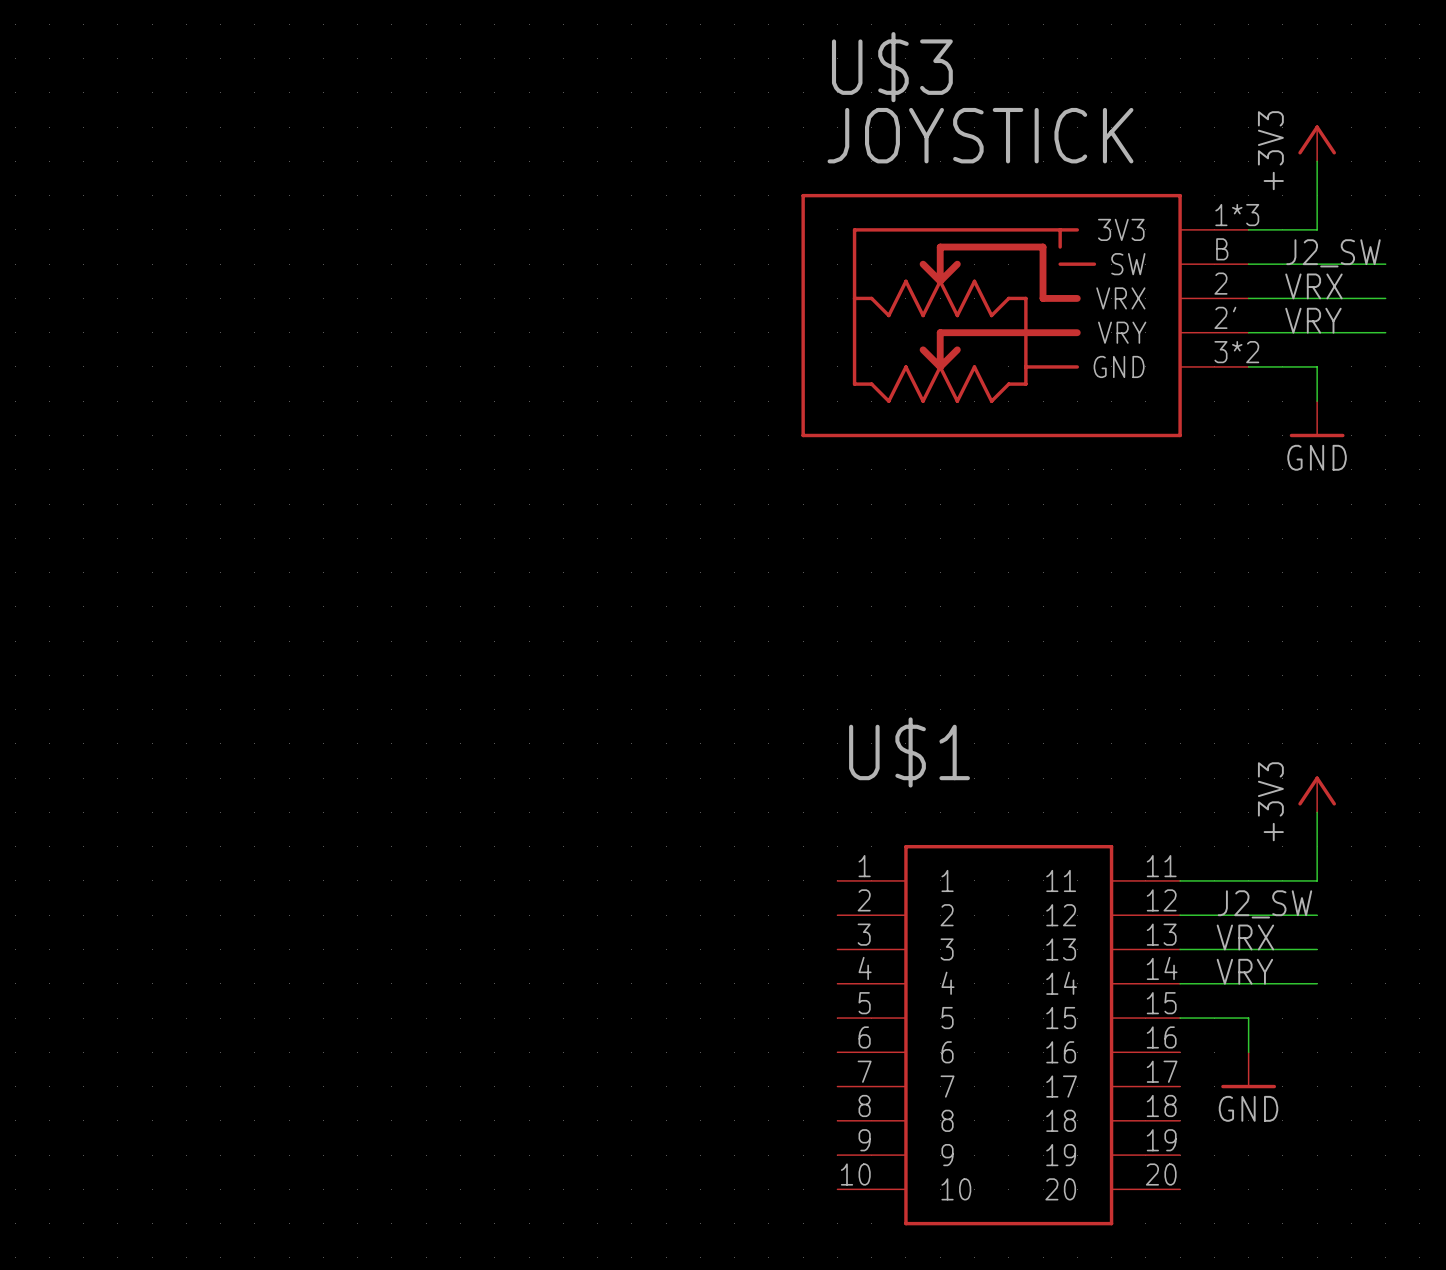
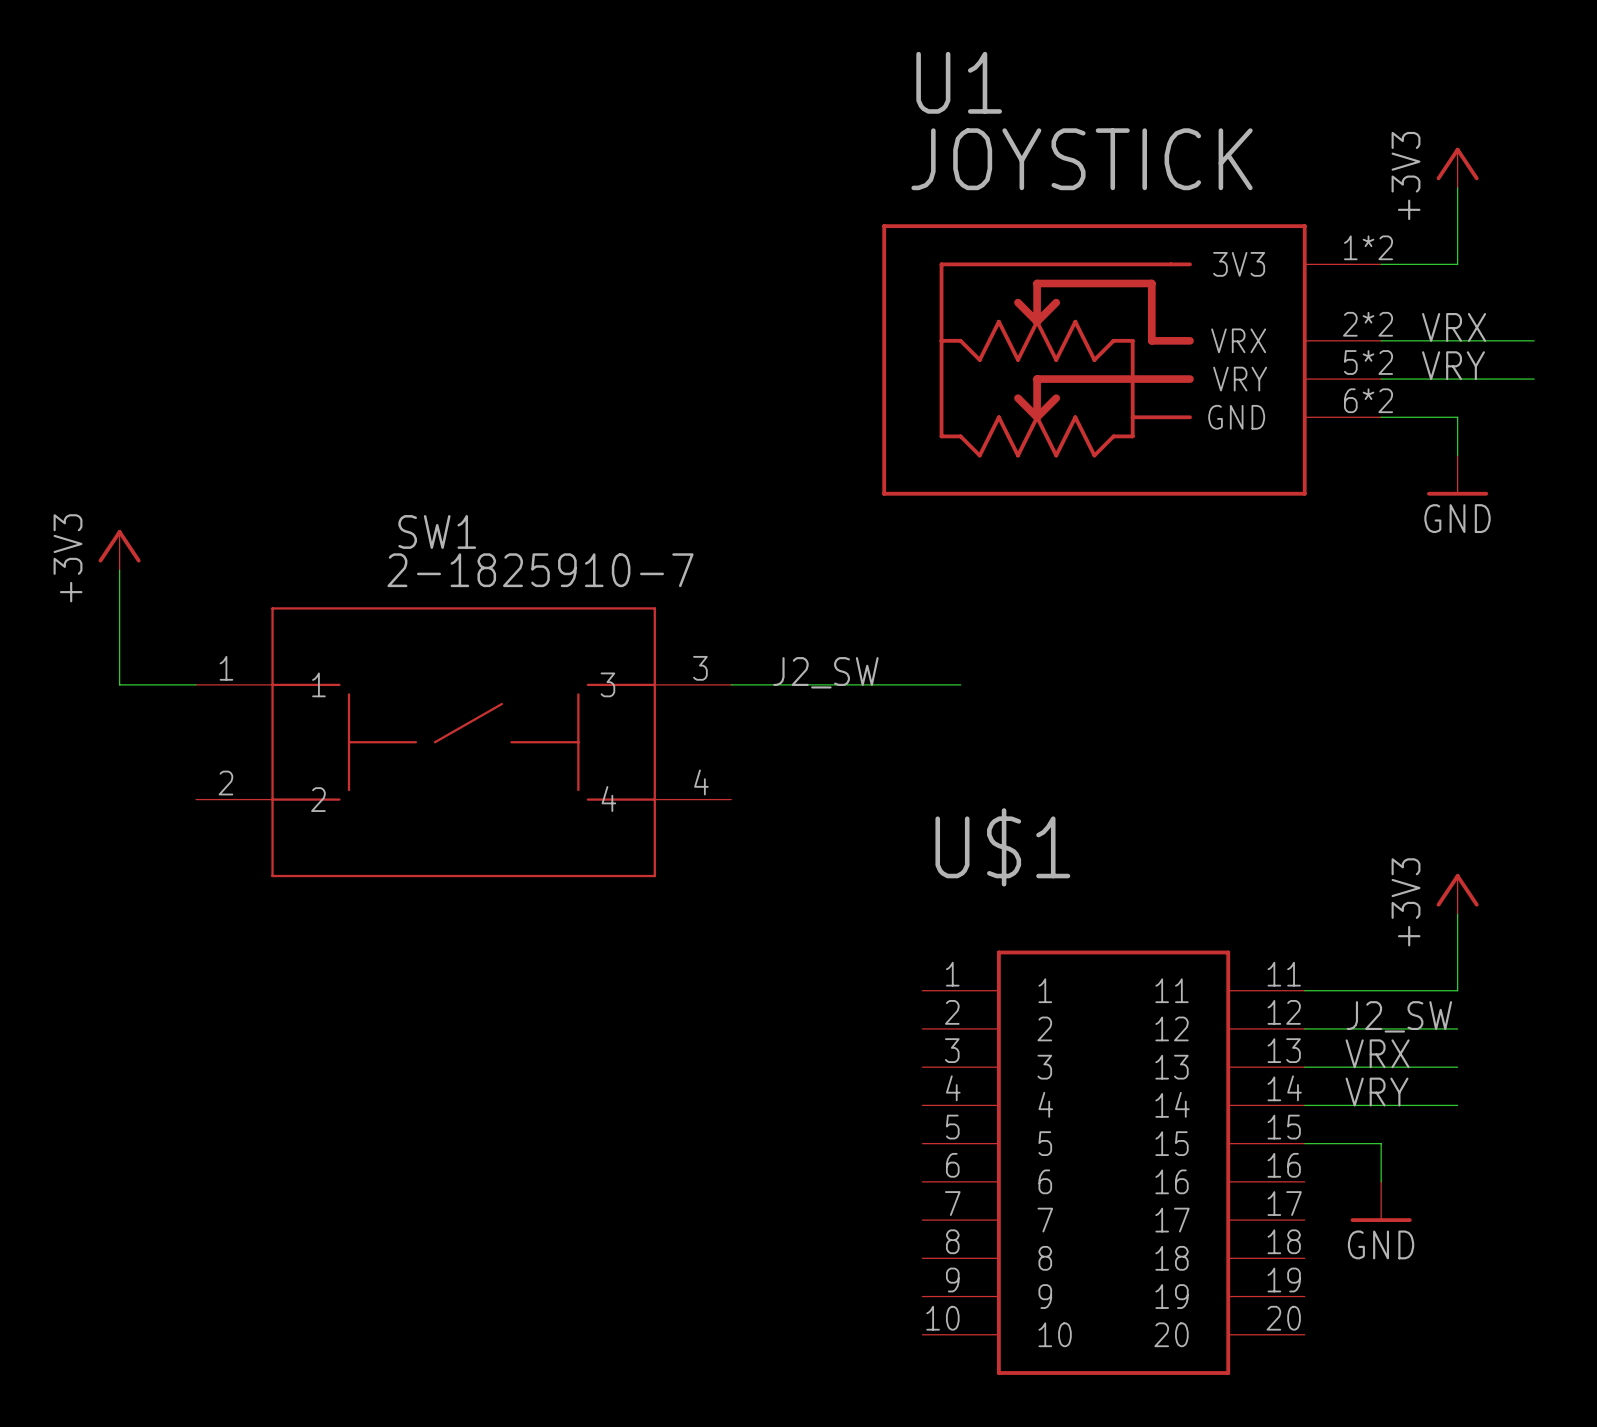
label: J2_SW (1333, 253) -> none
wire: (1248, 264) (1385, 264) -> none
U$3: (1025, 315) -> none
U1: none -> (1131, 359)
power symbol: none -> +3V3 (119, 550)
wire: none -> (119, 570) (119, 684) (196, 684)
label: none -> J2_SW (825, 672)
wire: none -> (731, 684) (960, 684)
SW1: none -> 2-1825910-7 (463, 742)

